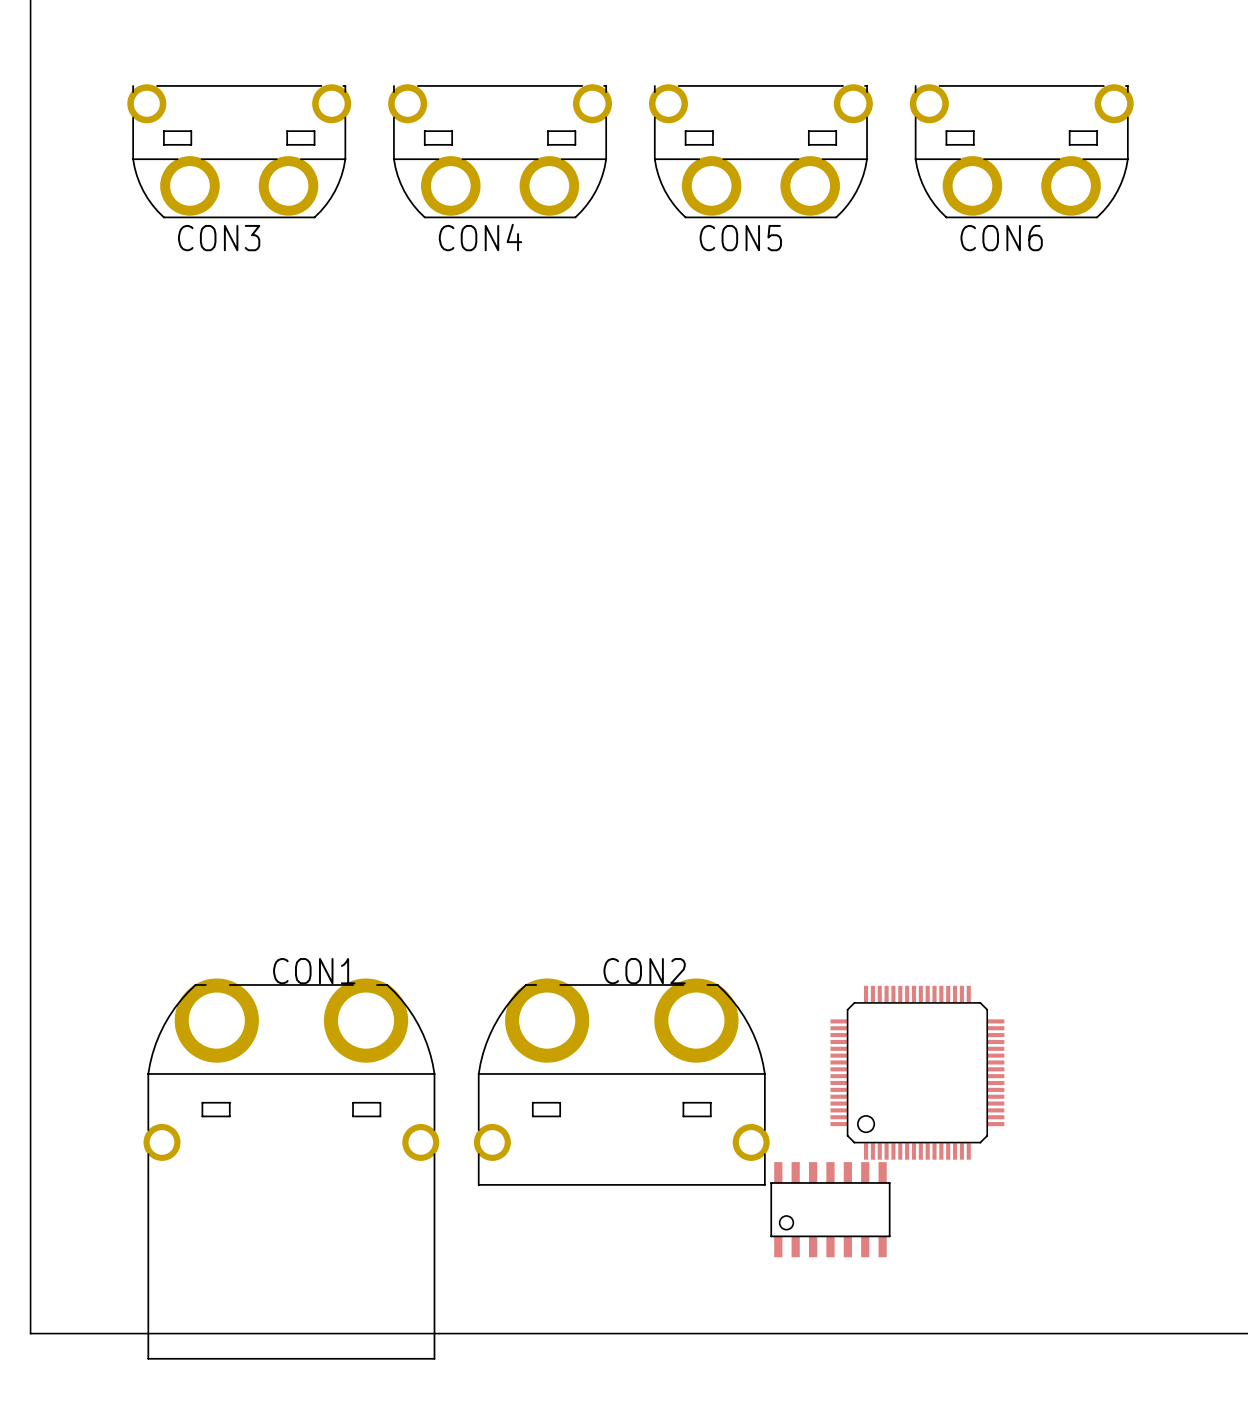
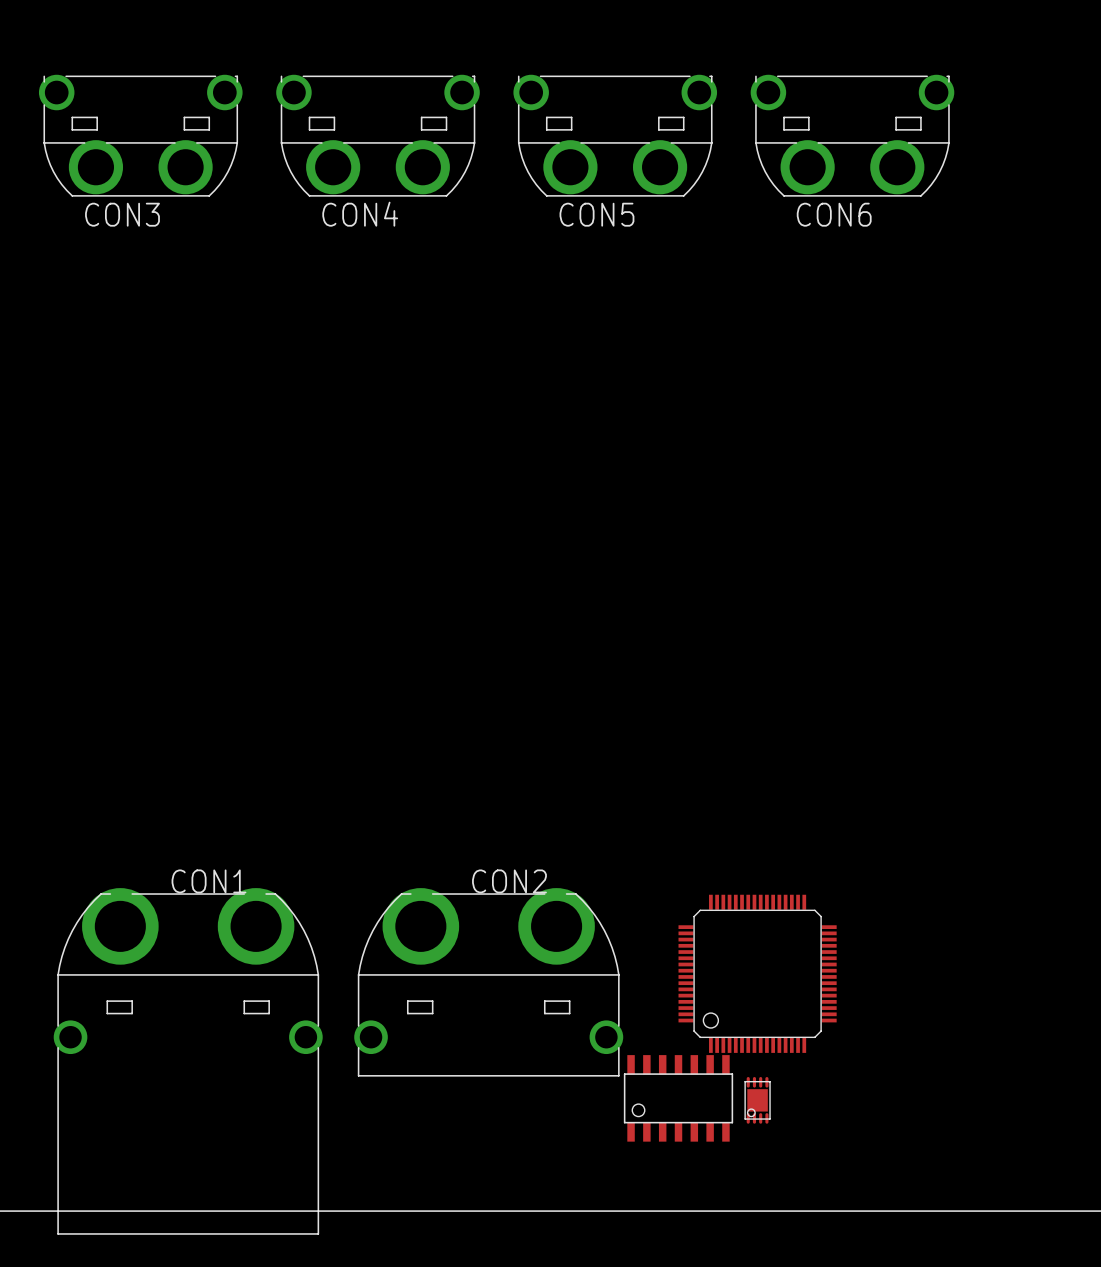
part: none -> (757, 1100)

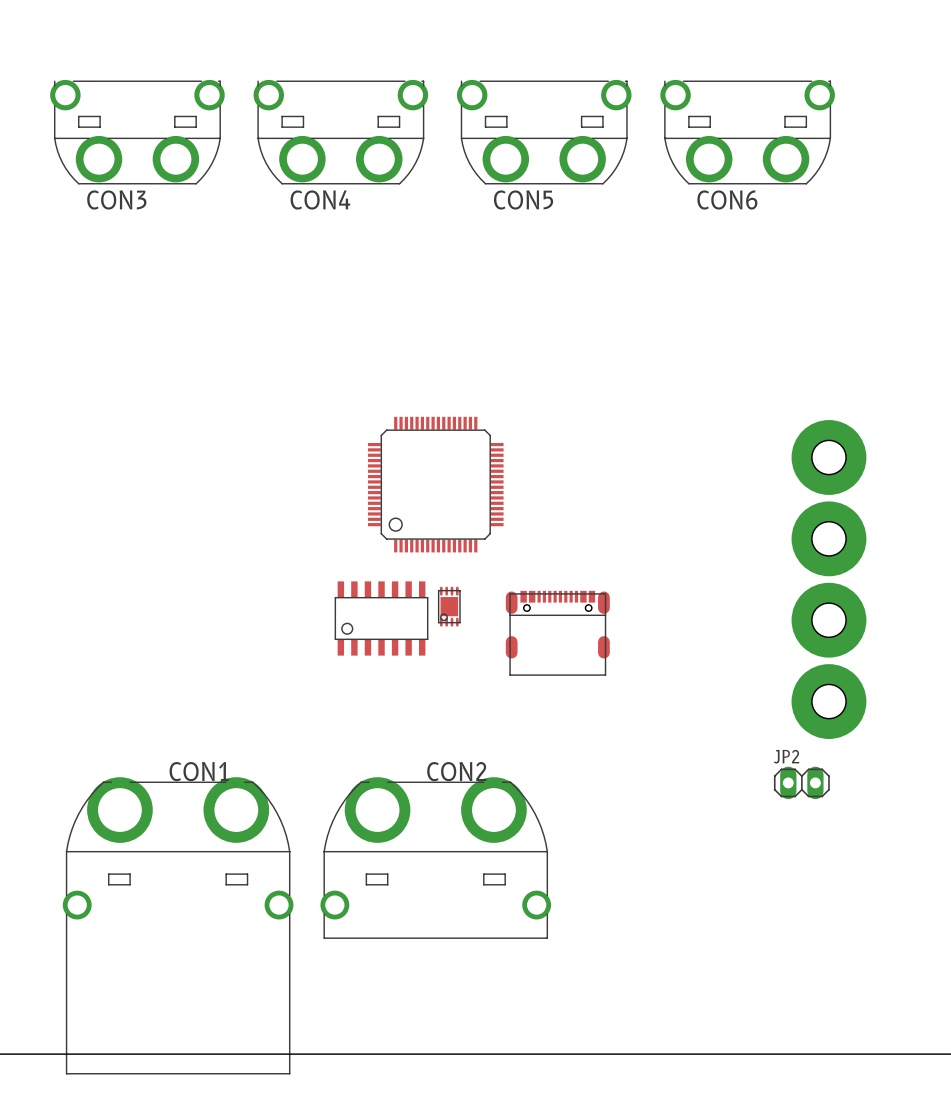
part: none -> (828, 457)
part: none -> (435, 484)
part: none -> (828, 538)
part: none -> (449, 606)
part: none -> (381, 618)
part: none -> (828, 620)
part: none -> (557, 633)
part: none -> (828, 701)
JP2: none -> (801, 782)
part: (757, 973) -> none
part: (678, 1098) -> none
part: (757, 1100) -> none

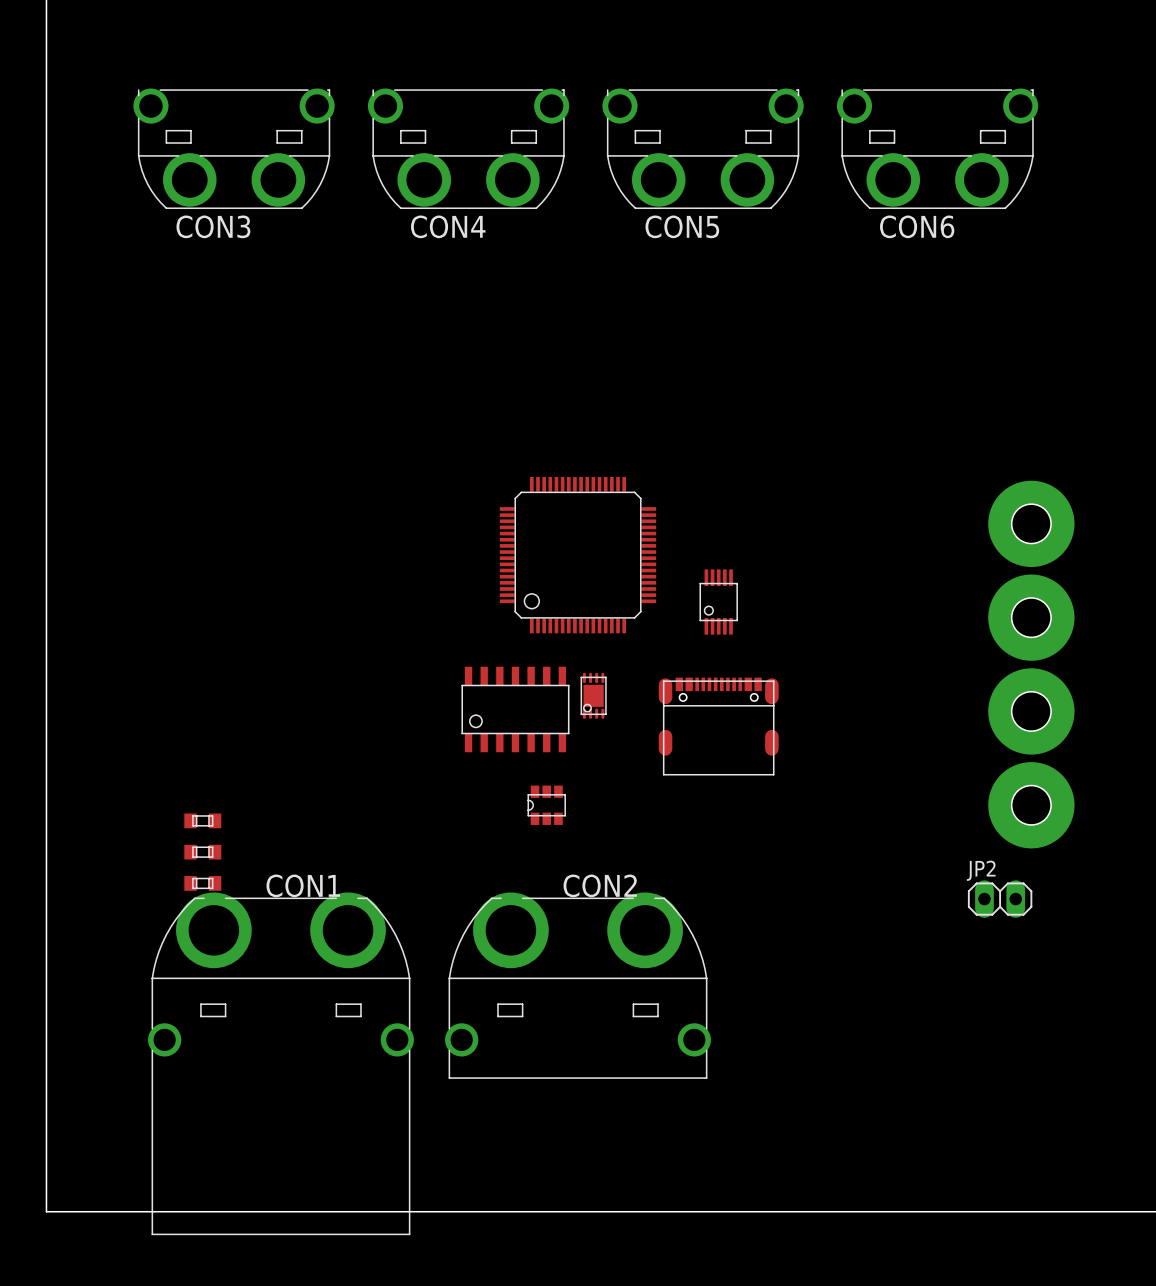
part: none -> (718, 602)
part: none -> (546, 805)
part: none -> (202, 820)
part: none -> (202, 852)
part: none -> (202, 883)

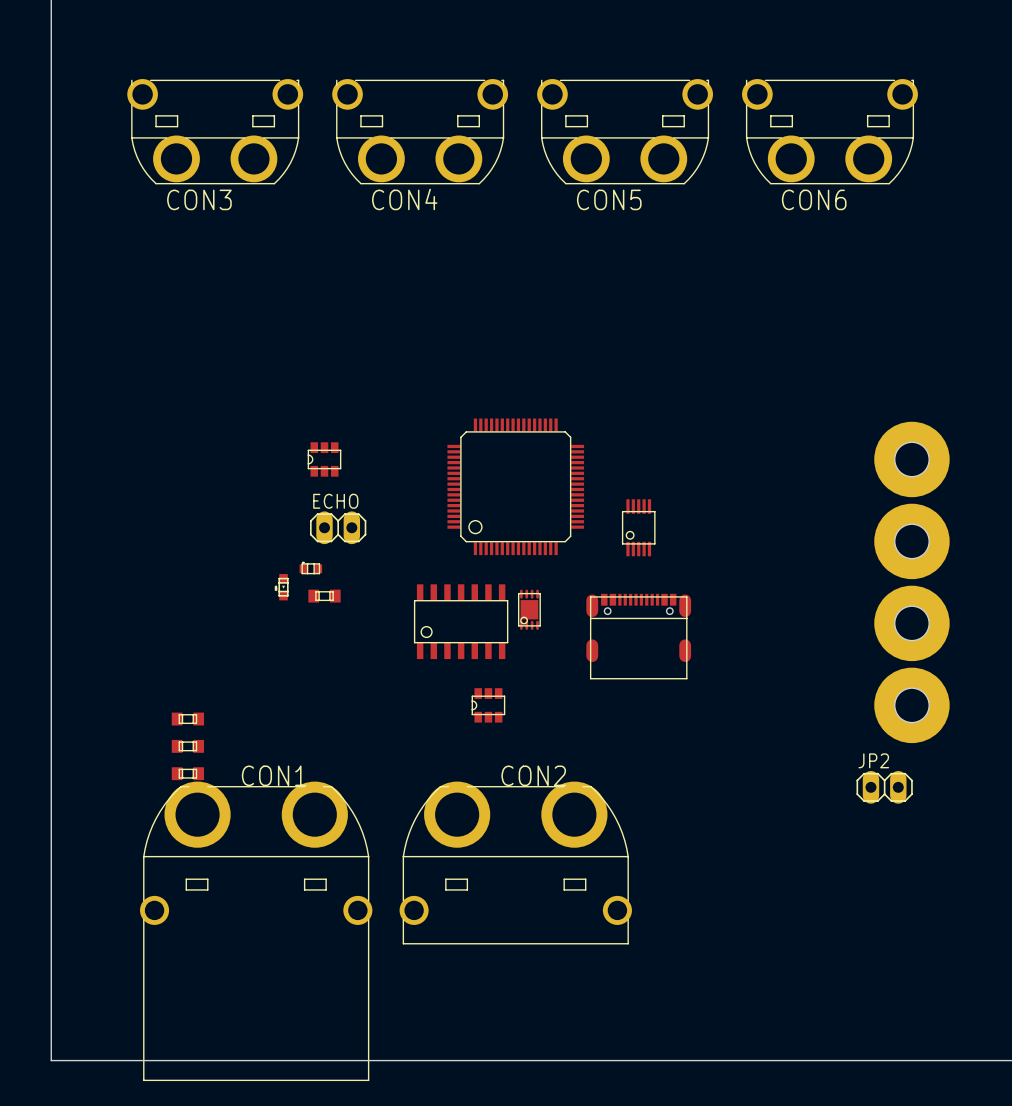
part: none -> (324, 459)
ECHO: none -> (338, 527)
part: none -> (310, 568)
part: none -> (283, 587)
part: none -> (324, 596)

